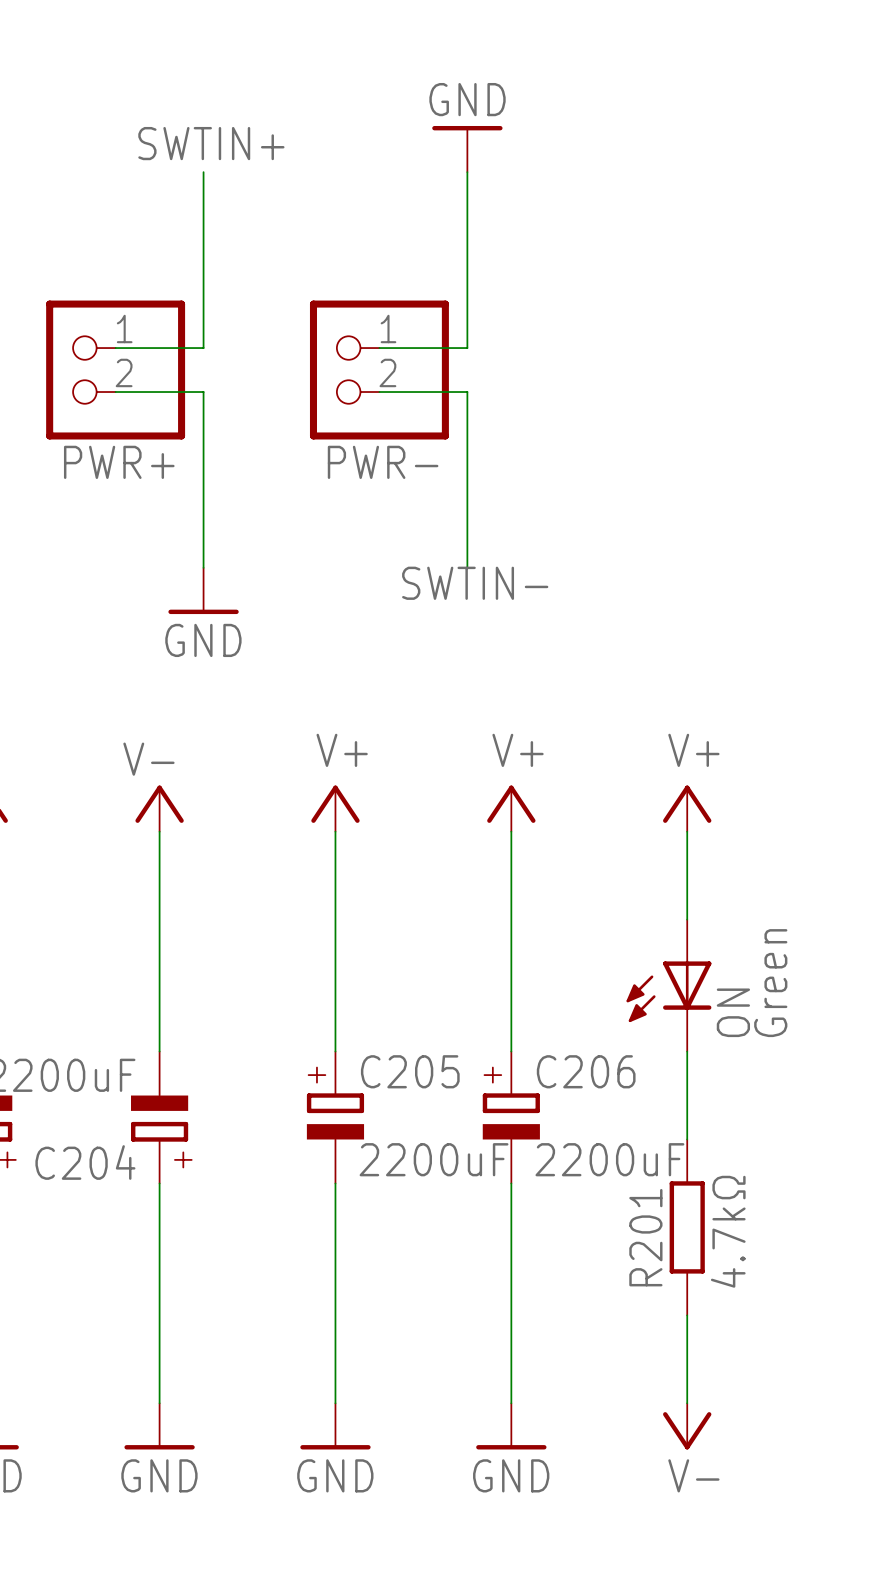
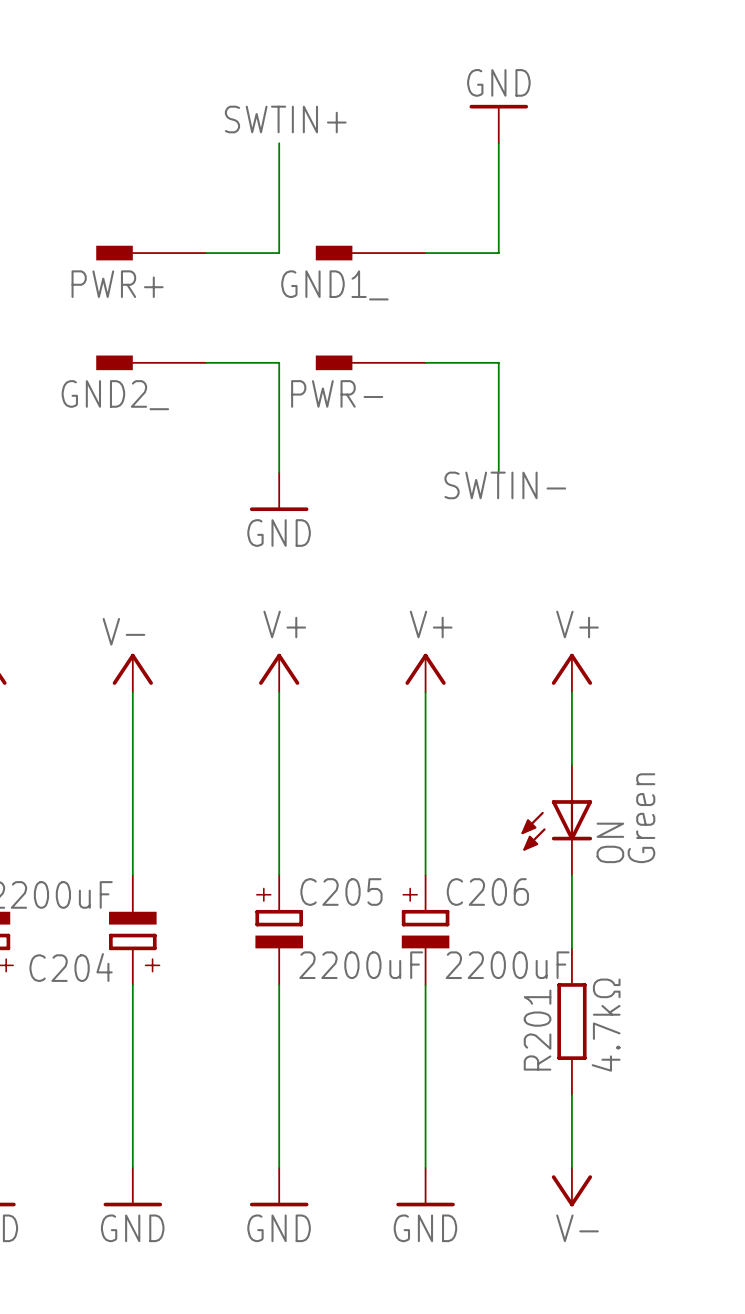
label position: SWTIN+ (211, 143) -> SWTIN+ (285, 119)
power symbol position: GND (467, 149) -> GND (498, 124)
wire: (203, 172) (203, 348) (115, 348) -> none
wire: none -> (279, 143) (279, 253) (206, 253)
wire: (467, 172) (467, 348) (379, 348) -> none
wire: none -> (498, 143) (498, 253) (425, 253)
PWR+: none -> (151, 253)
GND1_: none -> (370, 253)
PWR+: (115, 370) -> none
PWR-: (379, 370) -> none
wire: (115, 392) (203, 392) (203, 567) -> none
wire: (379, 392) (467, 392) (467, 567) -> none
GND2_: none -> (151, 362)
wire: none -> (206, 362) (279, 362) (279, 472)
PWR-: none -> (370, 362)
wire: none -> (425, 362) (498, 362) (498, 472)
label position: SWTIN- (475, 583) -> SWTIN- (505, 485)
power symbol position: GND (203, 590) -> GND (279, 491)

